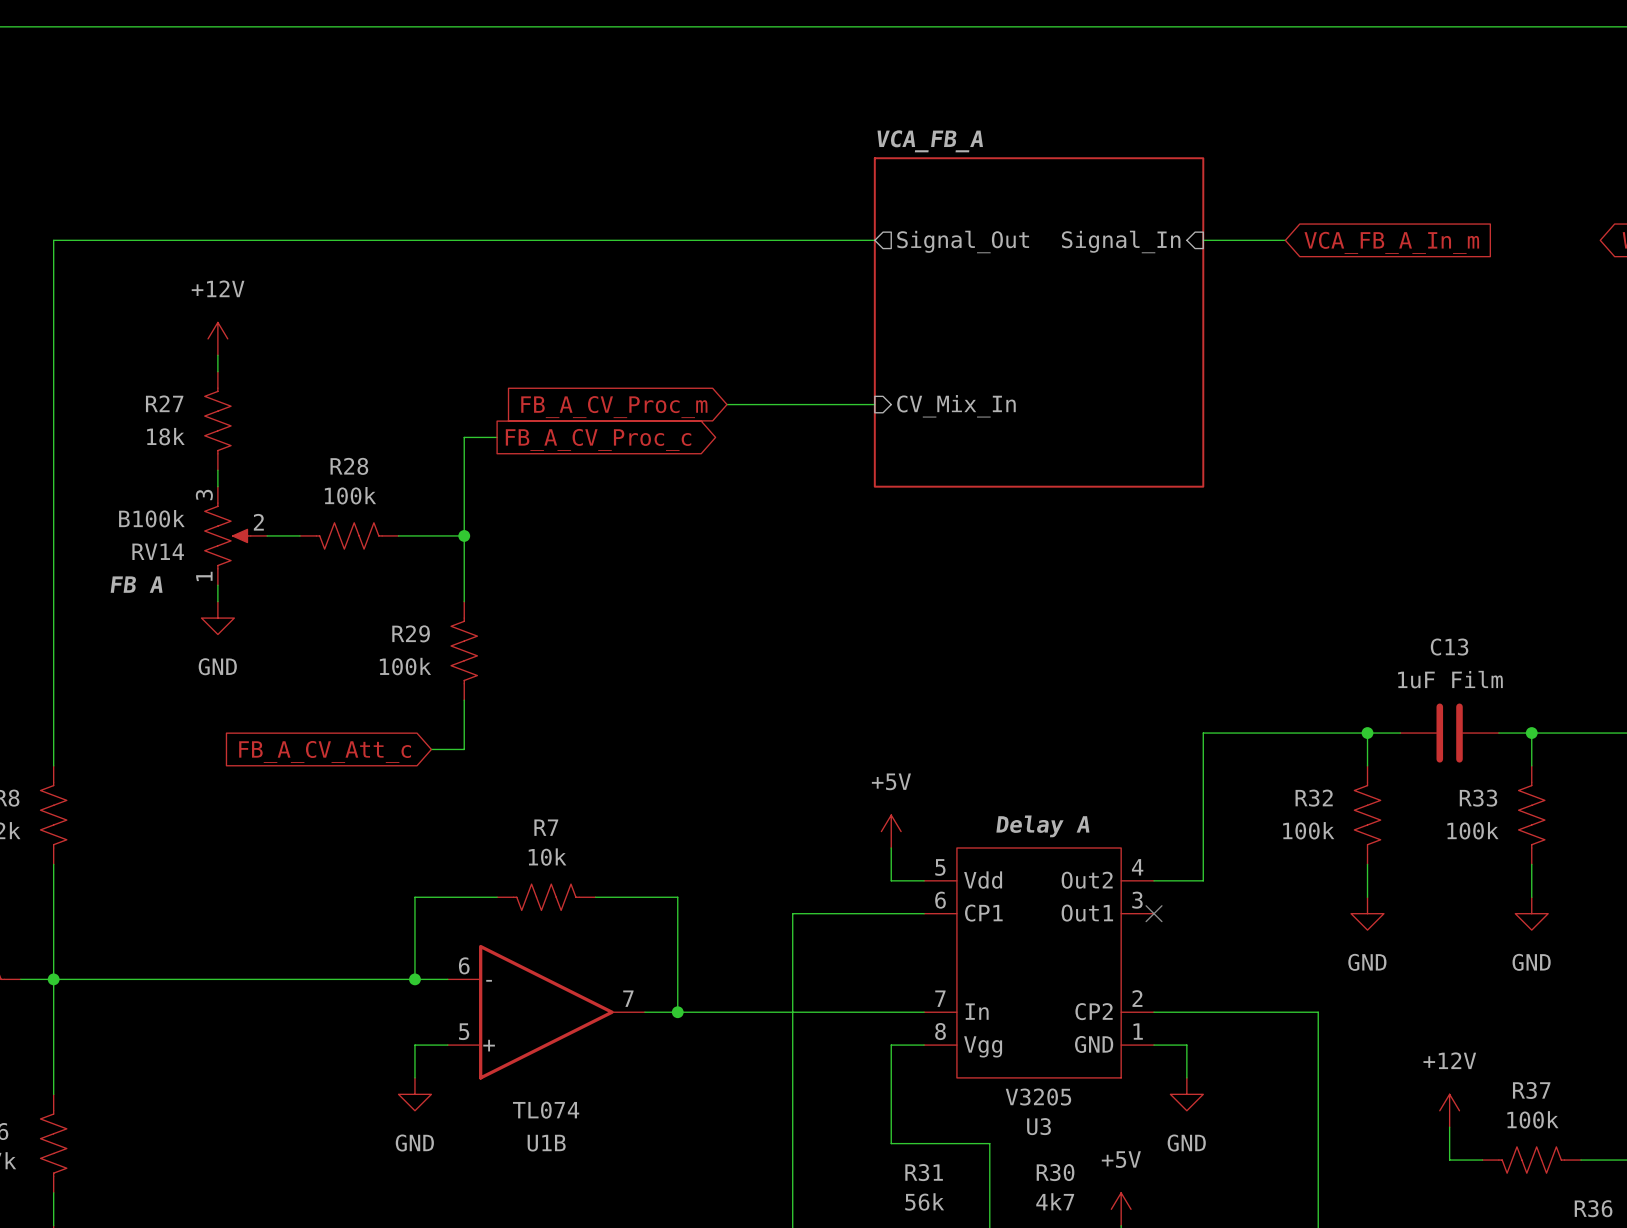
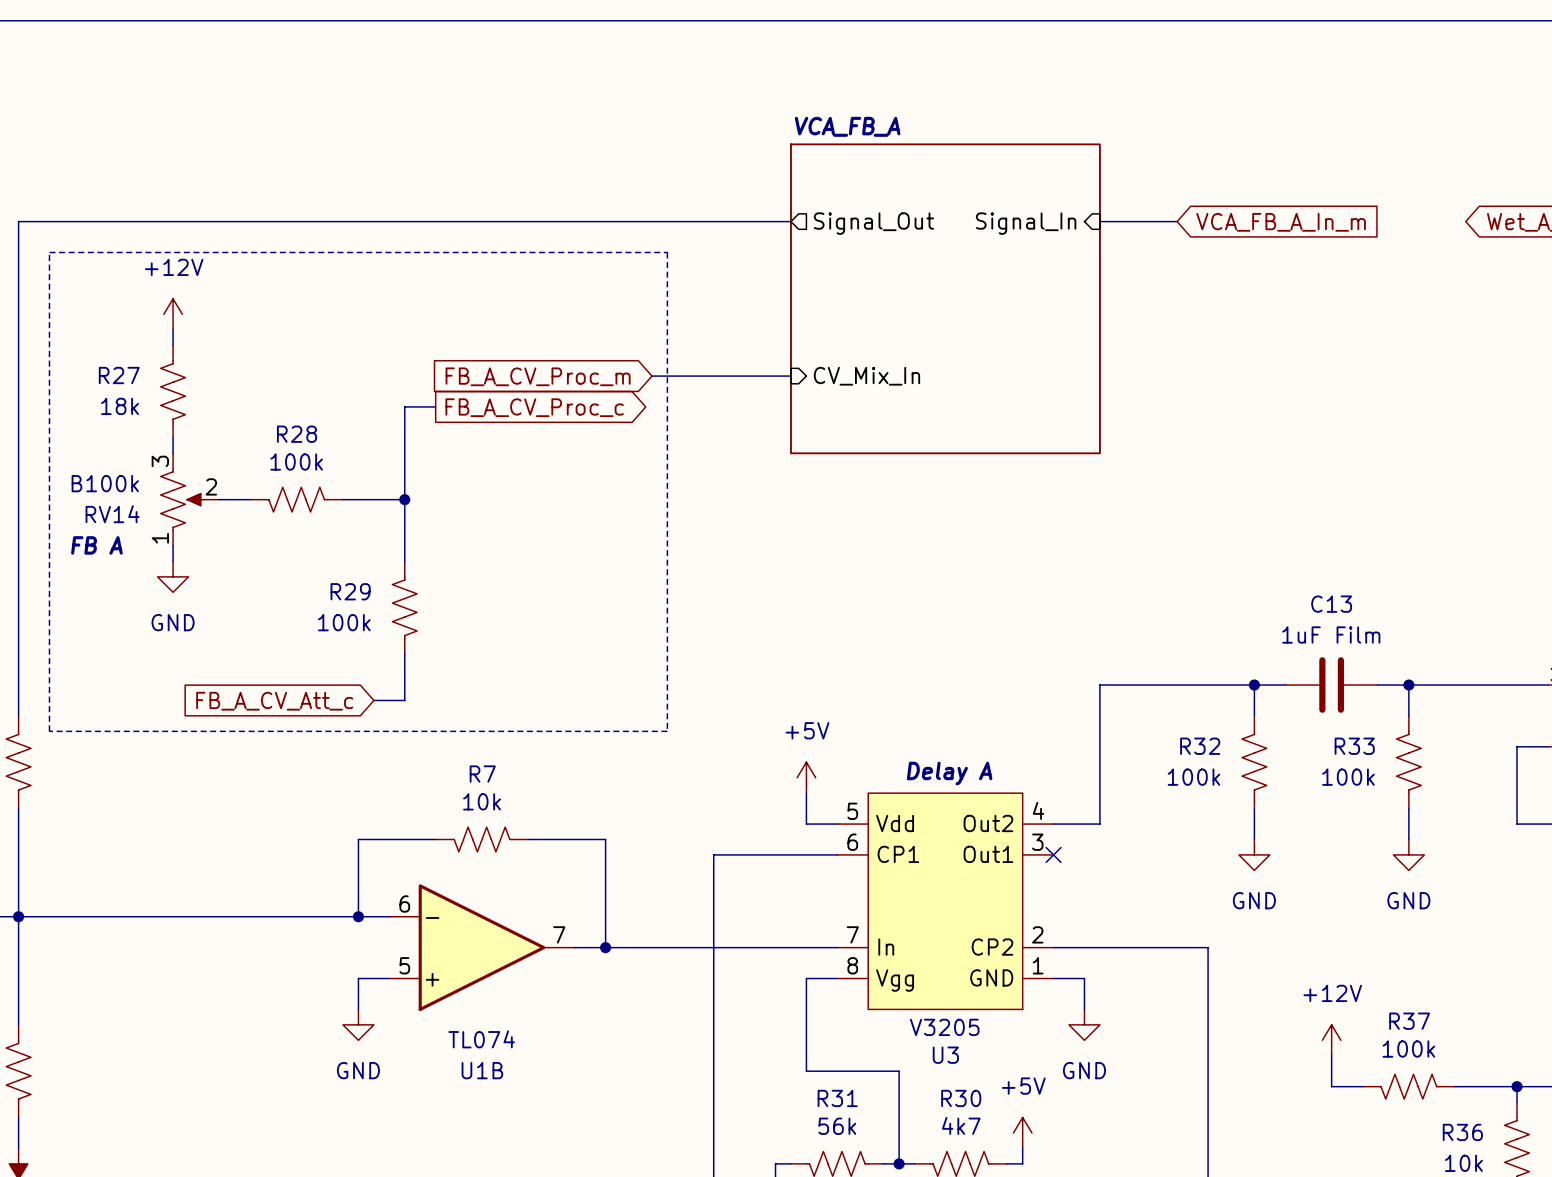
line: none -> (49, 252) (667, 252) (667, 731) (49, 731) (49, 252)

